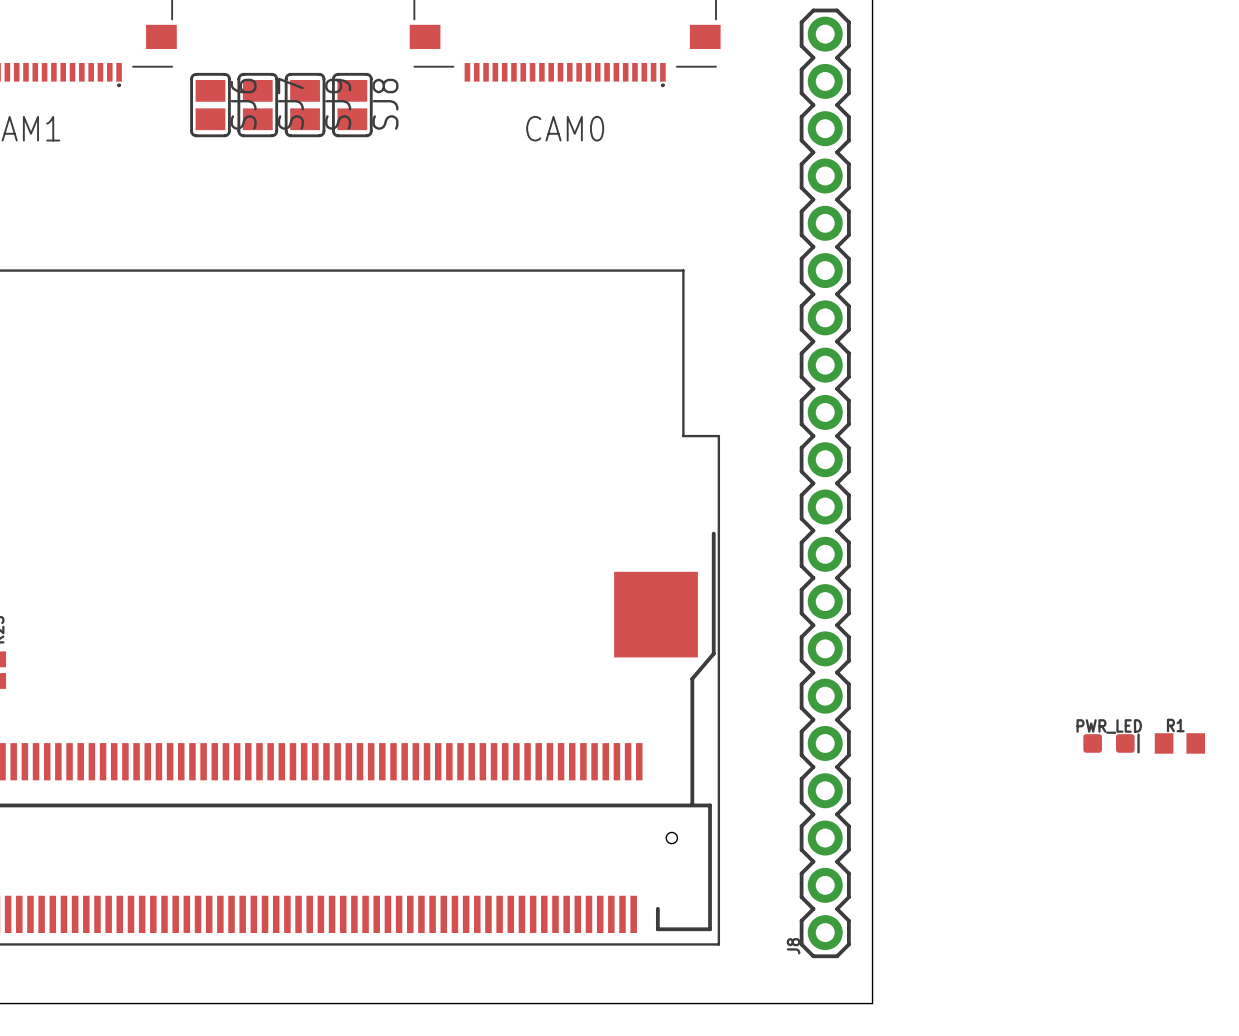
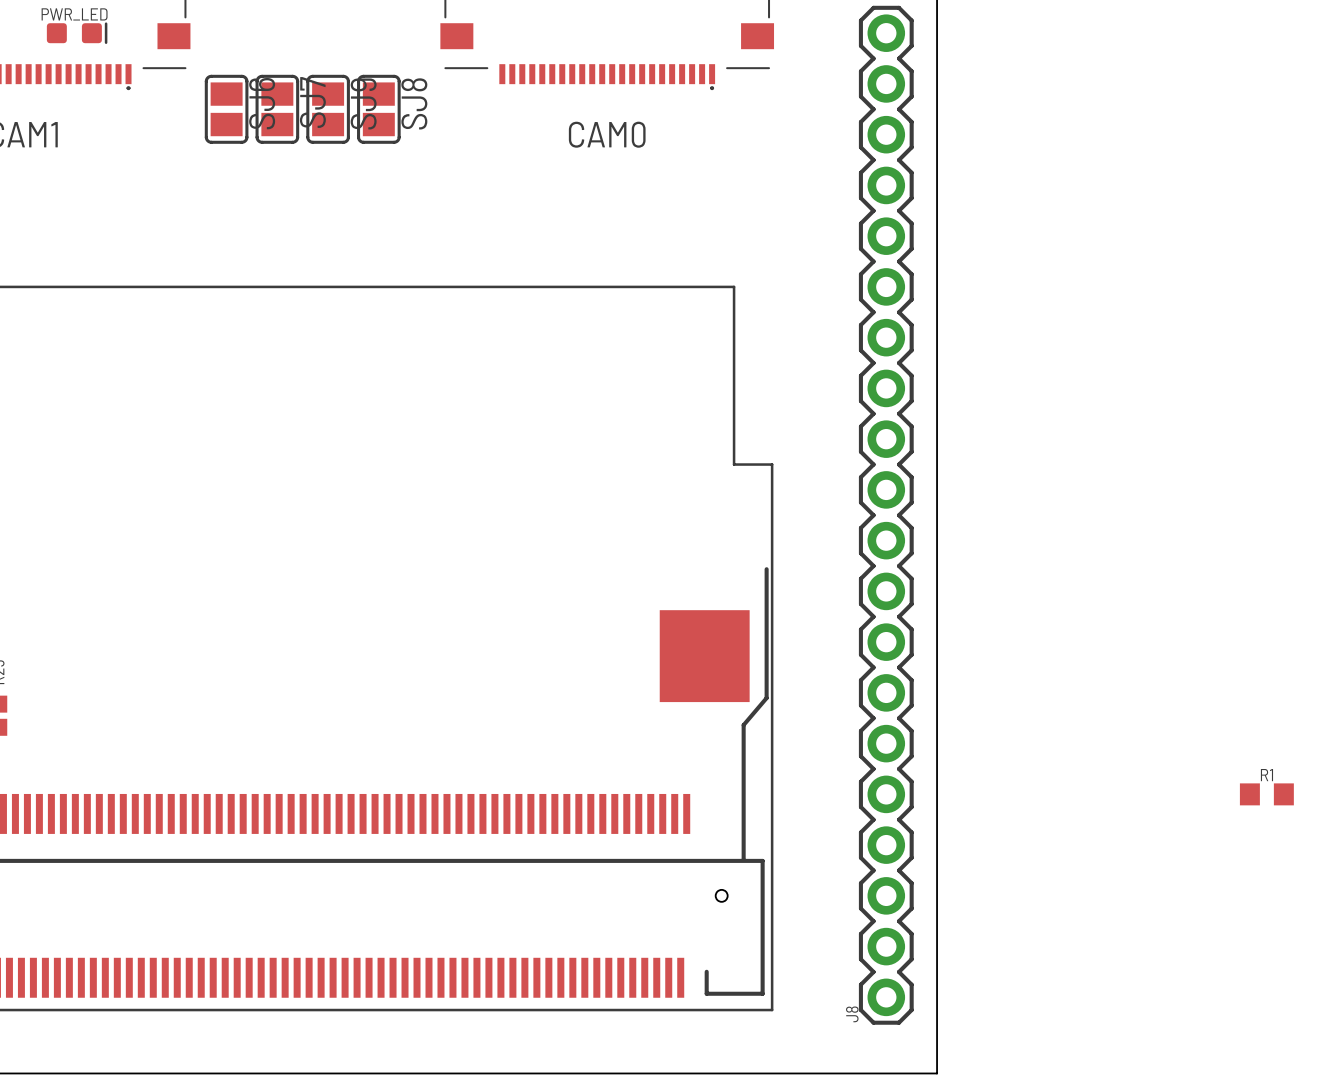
PWR_LED: none -> (77, 33)
PWR_LED: (1111, 743) -> none

